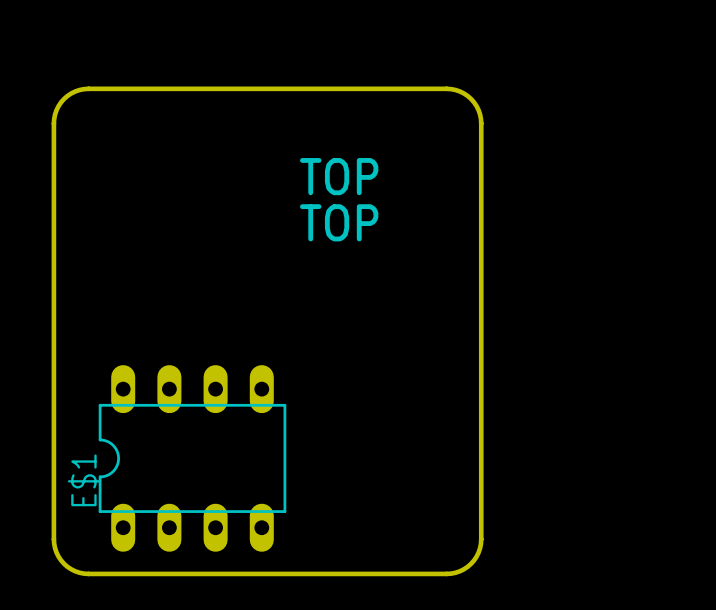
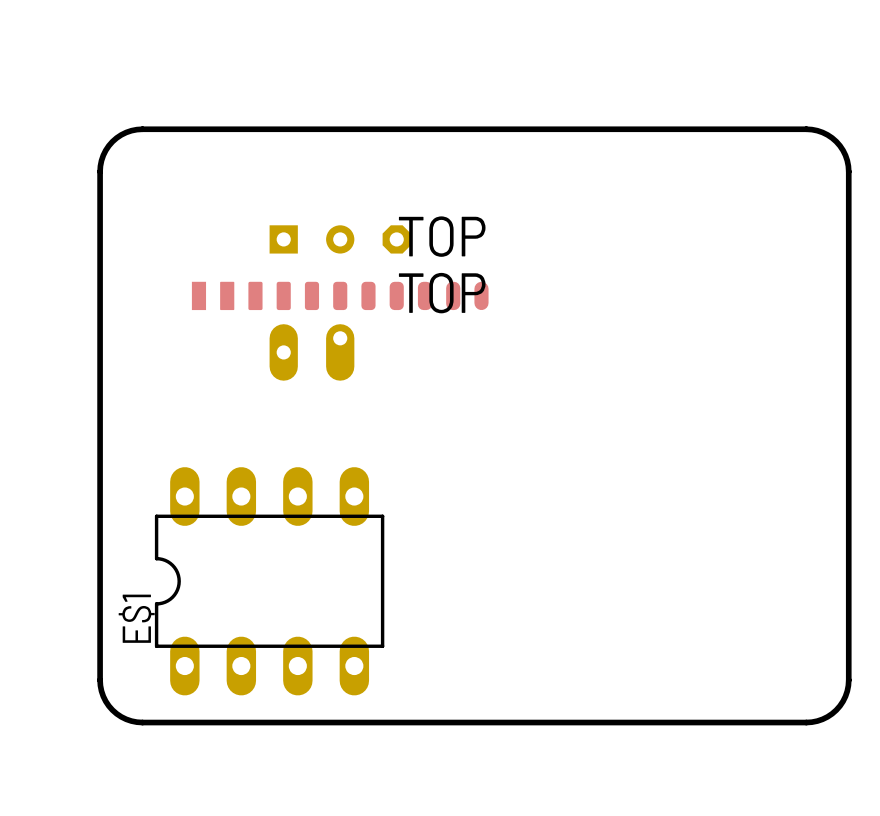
board edge: (446, 88) (459, 91) (471, 98) (478, 110) (481, 123) (480, 543) (476, 556) (467, 566) (455, 572) (446, 573) -> (580, 129) (811, 129) (827, 134) (839, 145) (847, 160) (848, 171) (848, 680) (845, 696) (832, 713) (811, 722) (580, 722)
part: none -> (340, 302)

